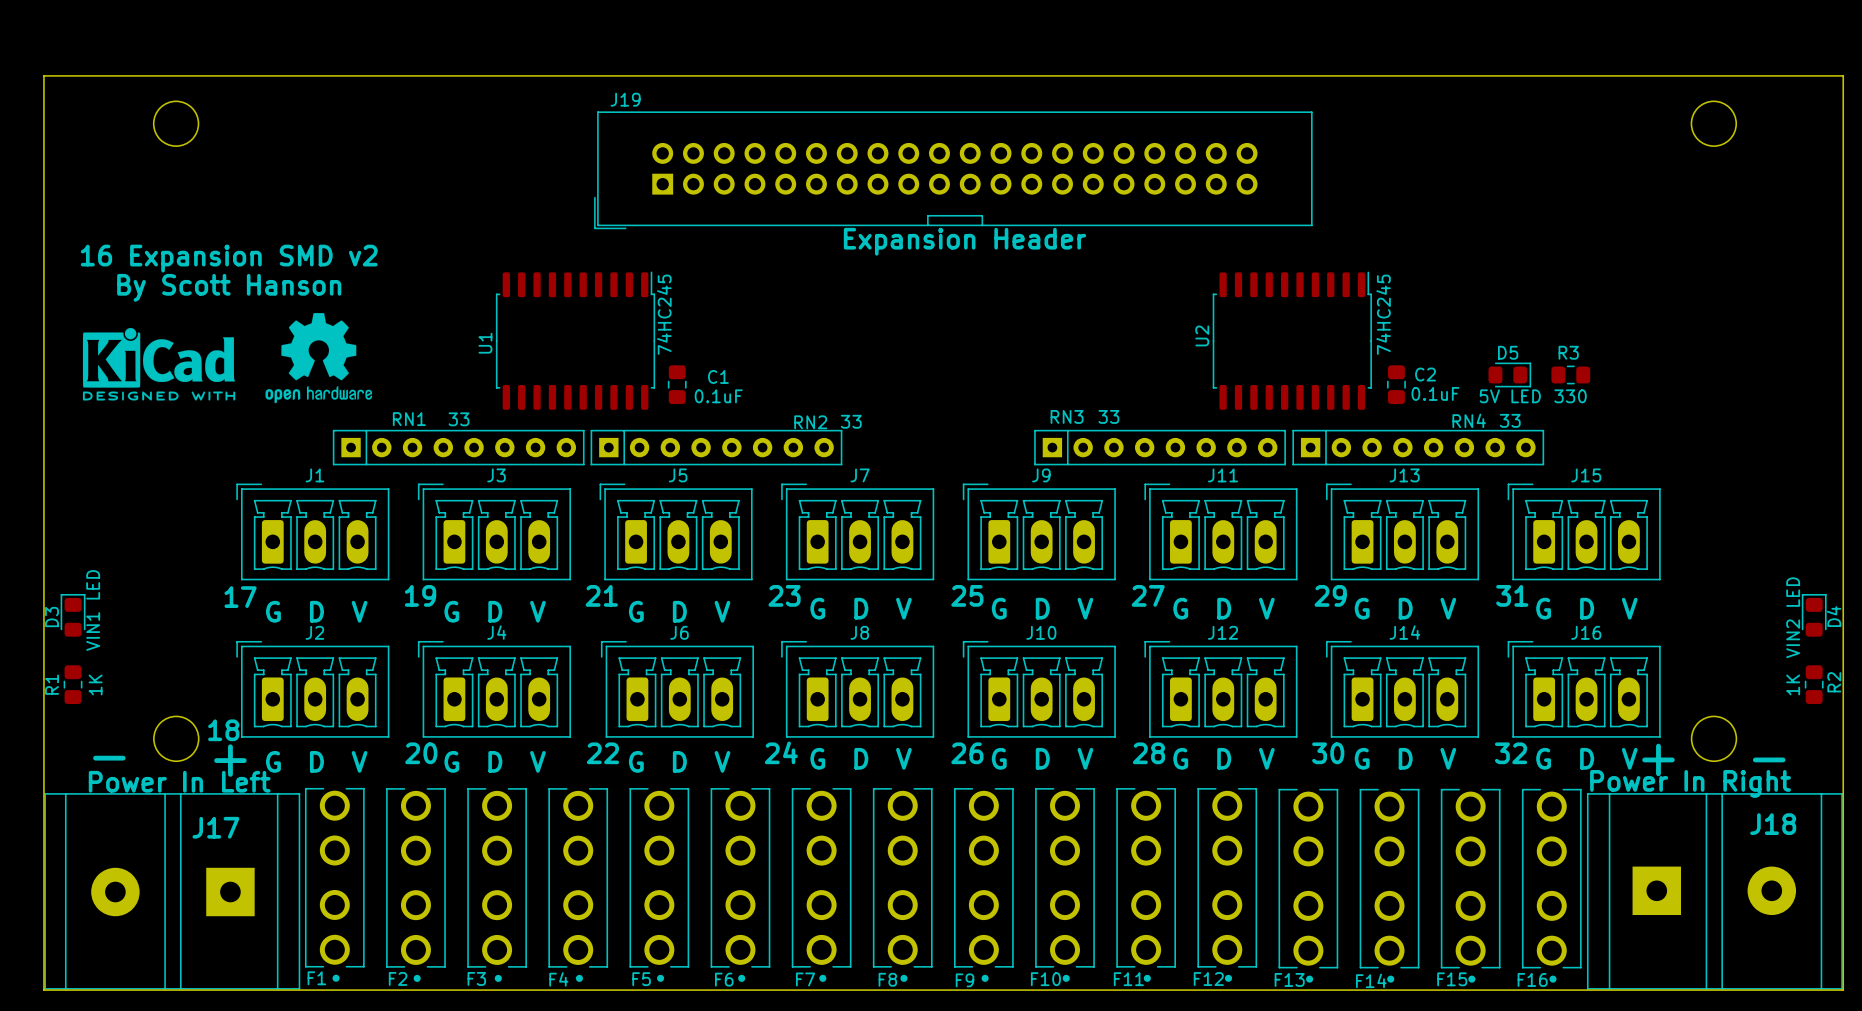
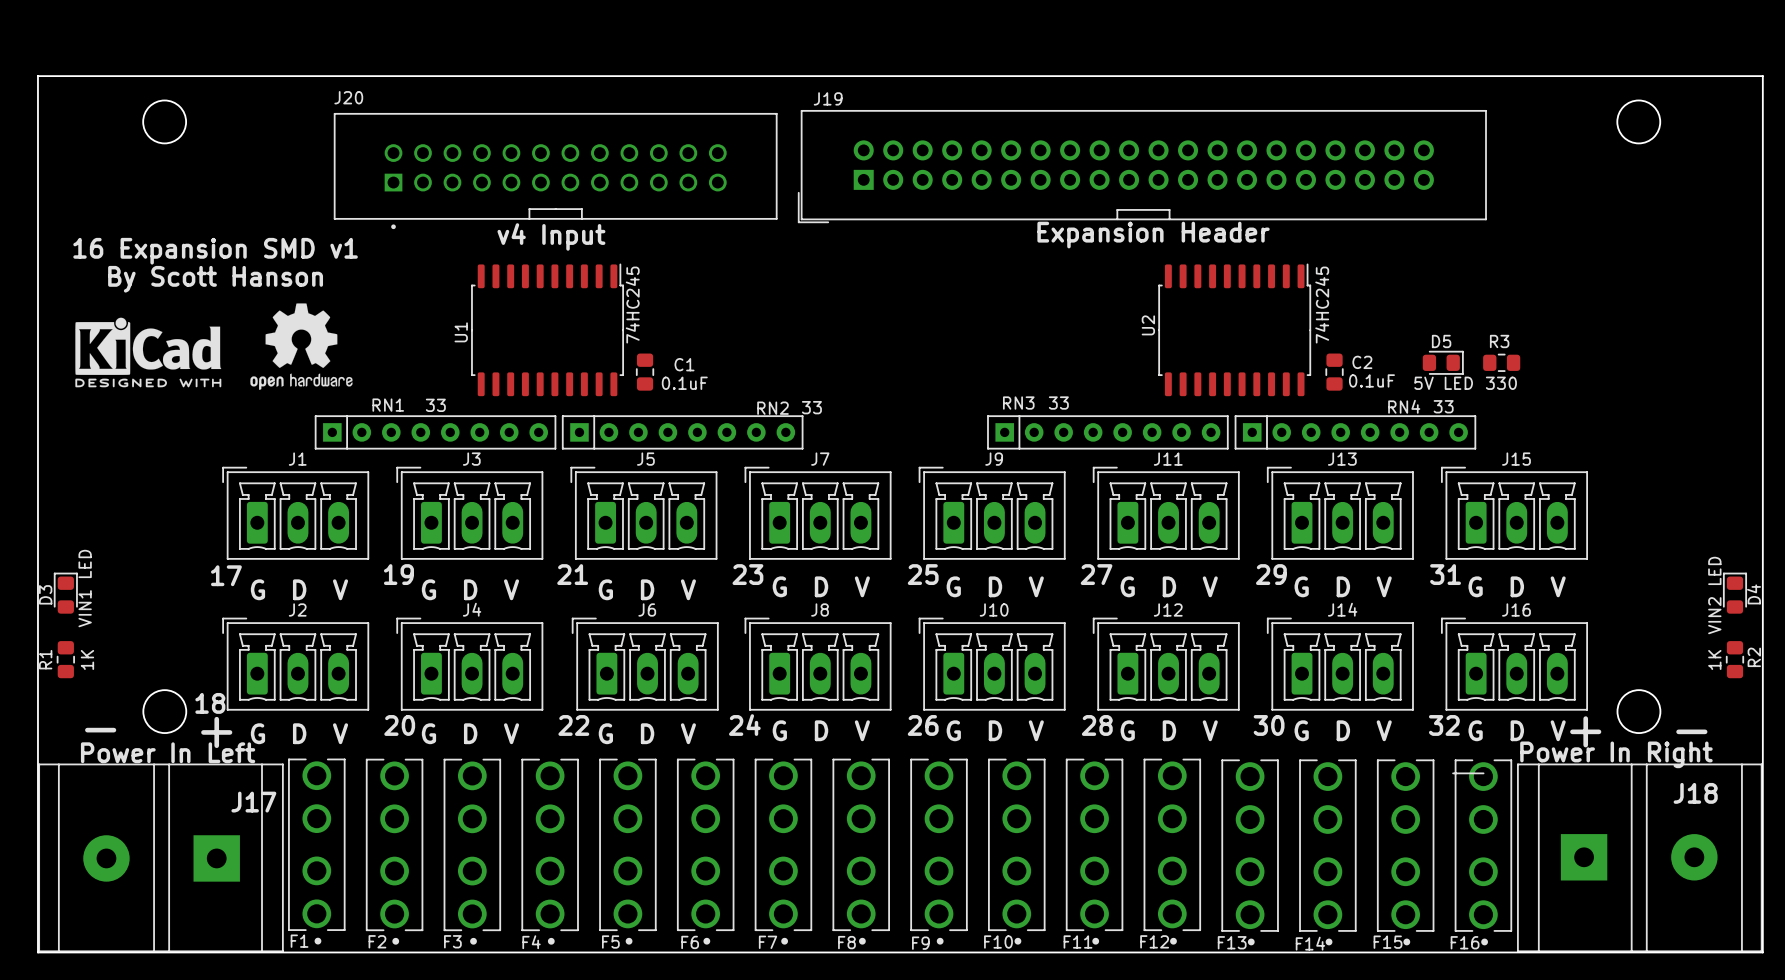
J19 position: (953, 170) -> (1142, 166)
J20: none -> v4 Input (555, 171)
line: (927, 225) (927, 215) (982, 215) (982, 225) -> (1117, 219) (1117, 209) (1169, 209) (1169, 219)
text: 16 Expansion SMD v2 (229, 258) -> 16 Expansion SMD v1 (215, 251)
line: none -> (1453, 773) (1483, 773)
J17 name position: J17 (215, 827) -> J17 (253, 802)

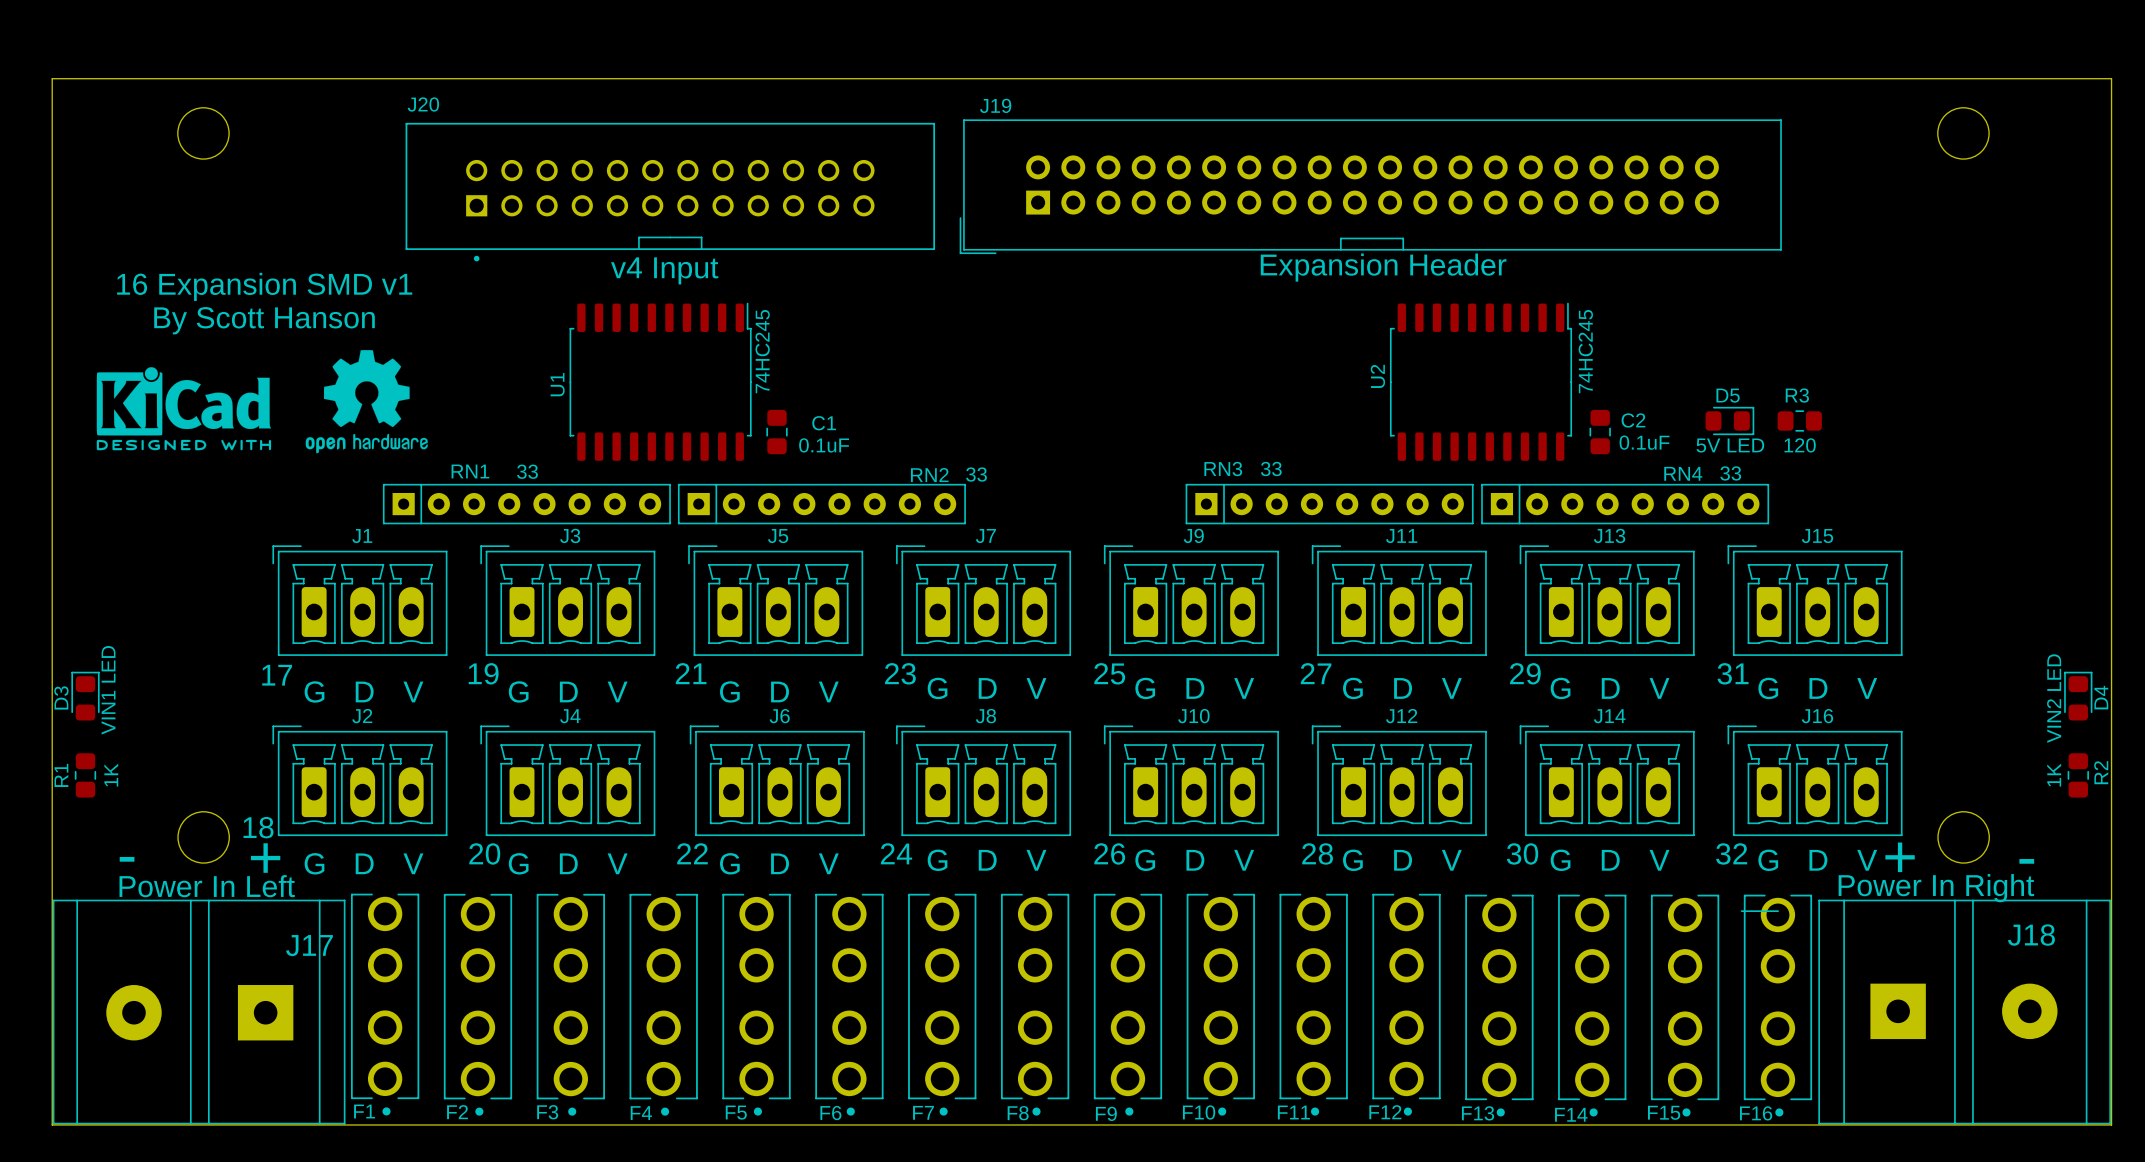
R3 value: 330 (1501, 383) -> 120 (1800, 445)

